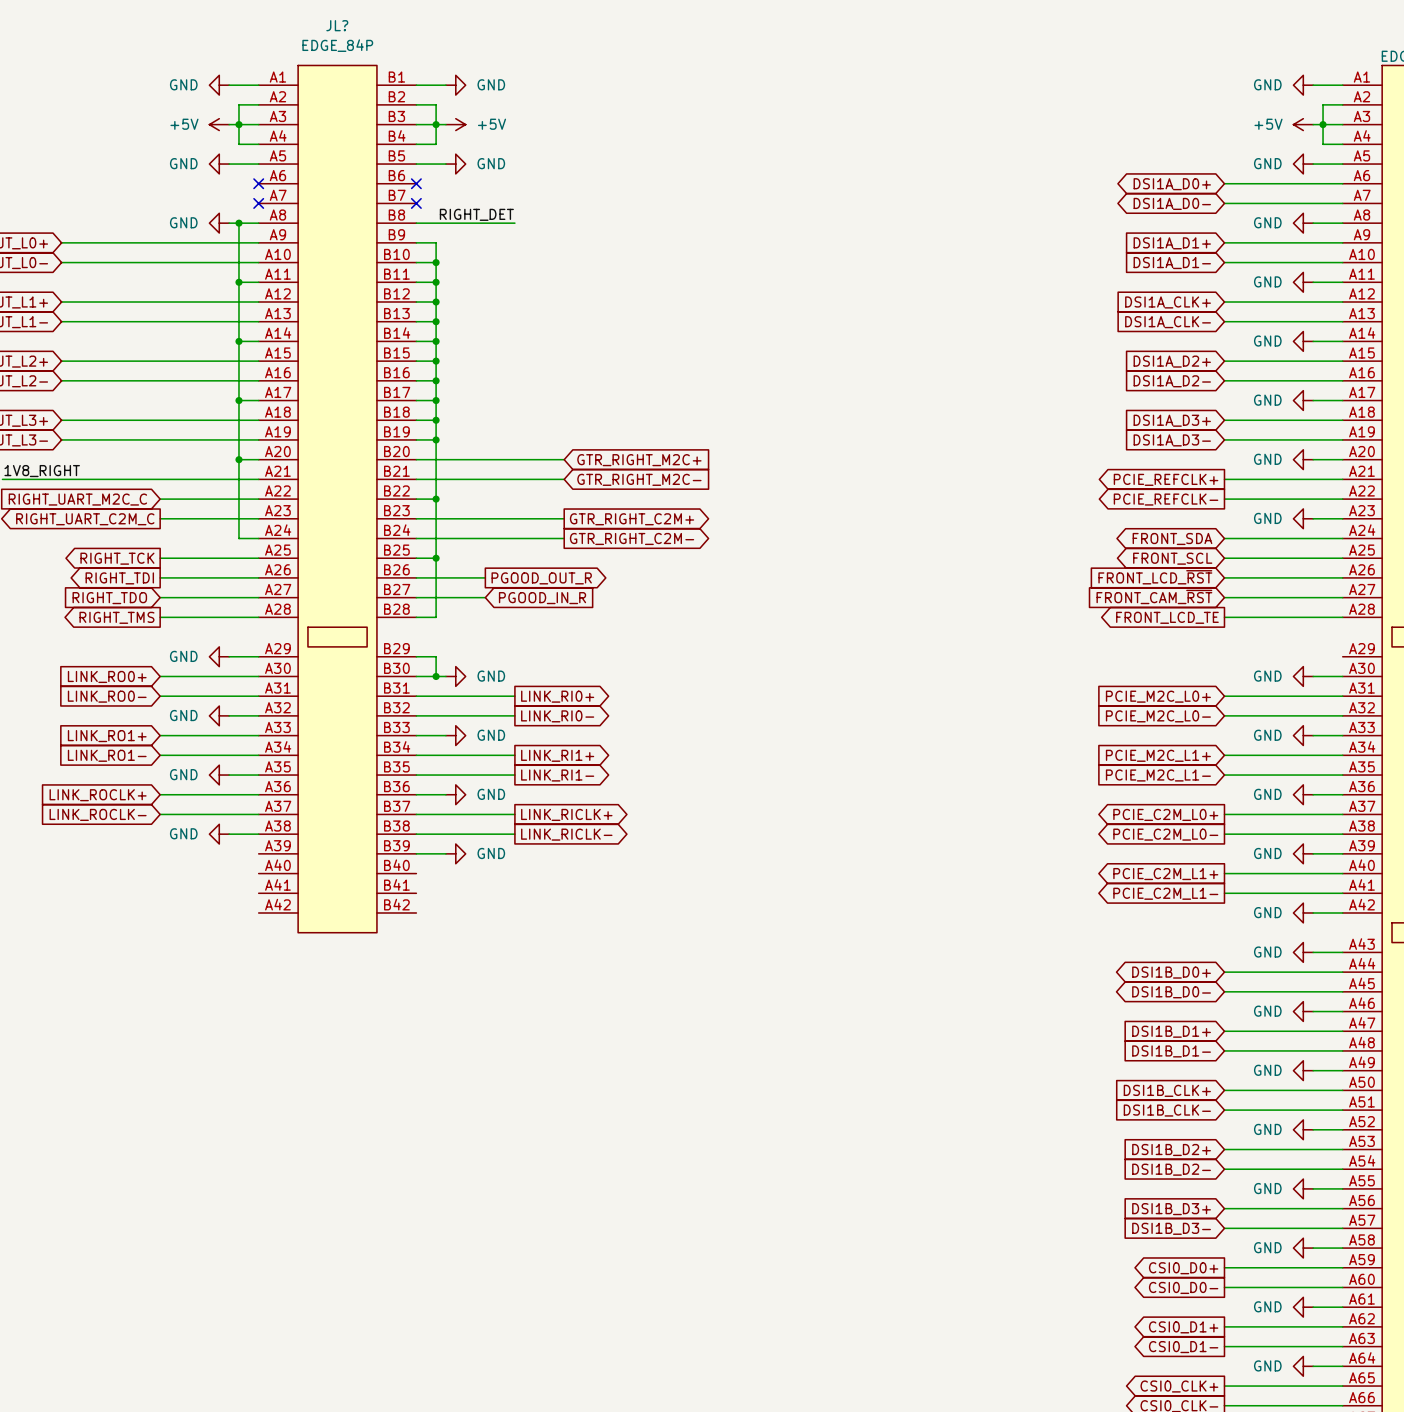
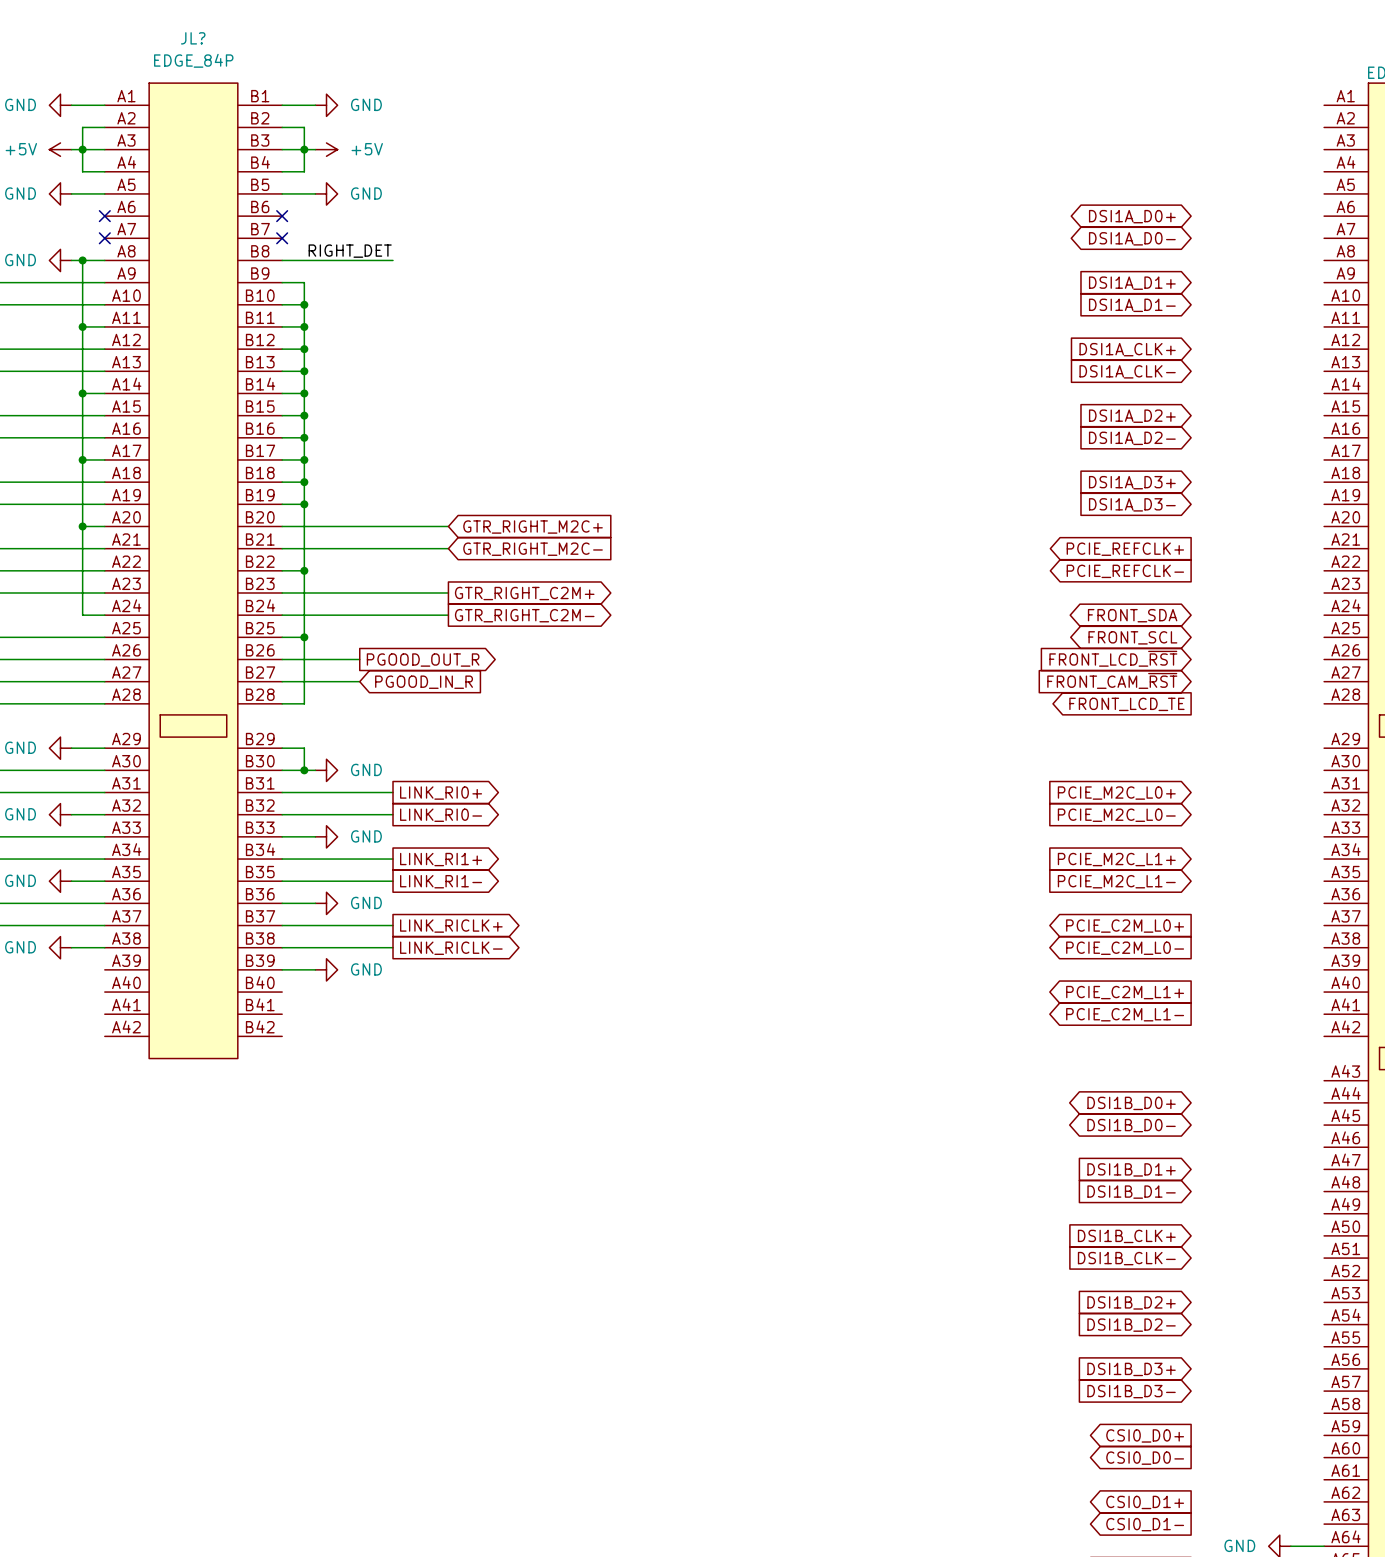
power symbol: GND (1303, 85) -> none
wire: (1313, 85) (1342, 85) -> none
wire: (1342, 104) (1323, 104) (1323, 144) (1342, 144) -> none
power symbol: +5V (1303, 124) -> none
wire: (1313, 124) (1342, 124) -> none
junction: (1323, 124) -> none
power symbol: GND (1303, 164) -> none
wire: (1313, 164) (1342, 164) -> none
wire: (1224, 183) (1342, 183) -> none
wire: (1224, 203) (1342, 203) -> none
power symbol: GND (1303, 223) -> none
wire: (1313, 223) (1342, 223) -> none
wire: (1224, 242) (1342, 242) -> none
wire: (1224, 262) (1342, 262) -> none
power symbol: GND (1303, 282) -> none
wire: (1313, 282) (1342, 282) -> none
wire: (1224, 301) (1342, 301) -> none
wire: (1224, 321) (1342, 321) -> none
power symbol: GND (1303, 341) -> none
wire: (1313, 341) (1342, 341) -> none
wire: (1224, 361) (1342, 361) -> none
wire: (1224, 380) (1342, 380) -> none
power symbol: GND (1303, 400) -> none
wire: (1313, 400) (1342, 400) -> none
wire: (1224, 420) (1342, 420) -> none
wire: (1224, 439) (1342, 439) -> none
power symbol: GND (1303, 459) -> none
wire: (1313, 459) (1342, 459) -> none
wire: (1224, 479) (1342, 479) -> none
wire: (1224, 499) (1342, 499) -> none
power symbol: GND (1303, 518) -> none
wire: (1313, 518) (1342, 518) -> none
wire: (1224, 538) (1342, 538) -> none
wire: (1224, 558) (1342, 558) -> none
wire: (1224, 577) (1342, 577) -> none
wire: (1224, 597) (1342, 597) -> none
wire: (1224, 617) (1342, 617) -> none
power symbol: GND (1303, 676) -> none
wire: (1313, 676) (1342, 676) -> none
wire: (1224, 696) (1342, 696) -> none
wire: (1224, 715) (1342, 715) -> none
power symbol: GND (1303, 735) -> none
wire: (1313, 735) (1342, 735) -> none
wire: (1224, 755) (1342, 755) -> none
wire: (1224, 775) (1342, 775) -> none
power symbol: GND (1303, 794) -> none
wire: (1313, 794) (1342, 794) -> none
wire: (1224, 814) (1342, 814) -> none
wire: (1224, 834) (1342, 834) -> none
power symbol: GND (1303, 853) -> none
wire: (1313, 853) (1342, 853) -> none
wire: (1224, 873) (1342, 873) -> none
wire: (1224, 893) (1342, 893) -> none
power symbol: GND (1303, 913) -> none
wire: (1313, 913) (1342, 913) -> none
power symbol: GND (1303, 952) -> none
wire: (1313, 952) (1342, 952) -> none
wire: (1224, 972) (1342, 972) -> none
wire: (1224, 991) (1342, 991) -> none
power symbol: GND (1303, 1011) -> none
wire: (1313, 1011) (1342, 1011) -> none
wire: (1224, 1031) (1342, 1031) -> none
wire: (1224, 1050) (1342, 1050) -> none
power symbol: GND (1303, 1070) -> none
wire: (1313, 1070) (1342, 1070) -> none
wire: (1224, 1090) (1342, 1090) -> none
wire: (1224, 1110) (1342, 1110) -> none
power symbol: GND (1303, 1129) -> none
wire: (1313, 1129) (1342, 1129) -> none
wire: (1224, 1149) (1342, 1149) -> none
wire: (1224, 1169) (1342, 1169) -> none
power symbol: GND (1303, 1188) -> none
wire: (1313, 1188) (1342, 1188) -> none
wire: (1224, 1208) (1342, 1208) -> none
wire: (1224, 1228) (1342, 1228) -> none
power symbol: GND (1303, 1248) -> none
wire: (1313, 1248) (1342, 1248) -> none
wire: (1224, 1267) (1342, 1267) -> none
wire: (1224, 1287) (1342, 1287) -> none
power symbol: GND (1303, 1307) -> none
wire: (1313, 1307) (1342, 1307) -> none
wire: (1224, 1326) (1342, 1326) -> none
wire: (1224, 1346) (1342, 1346) -> none

